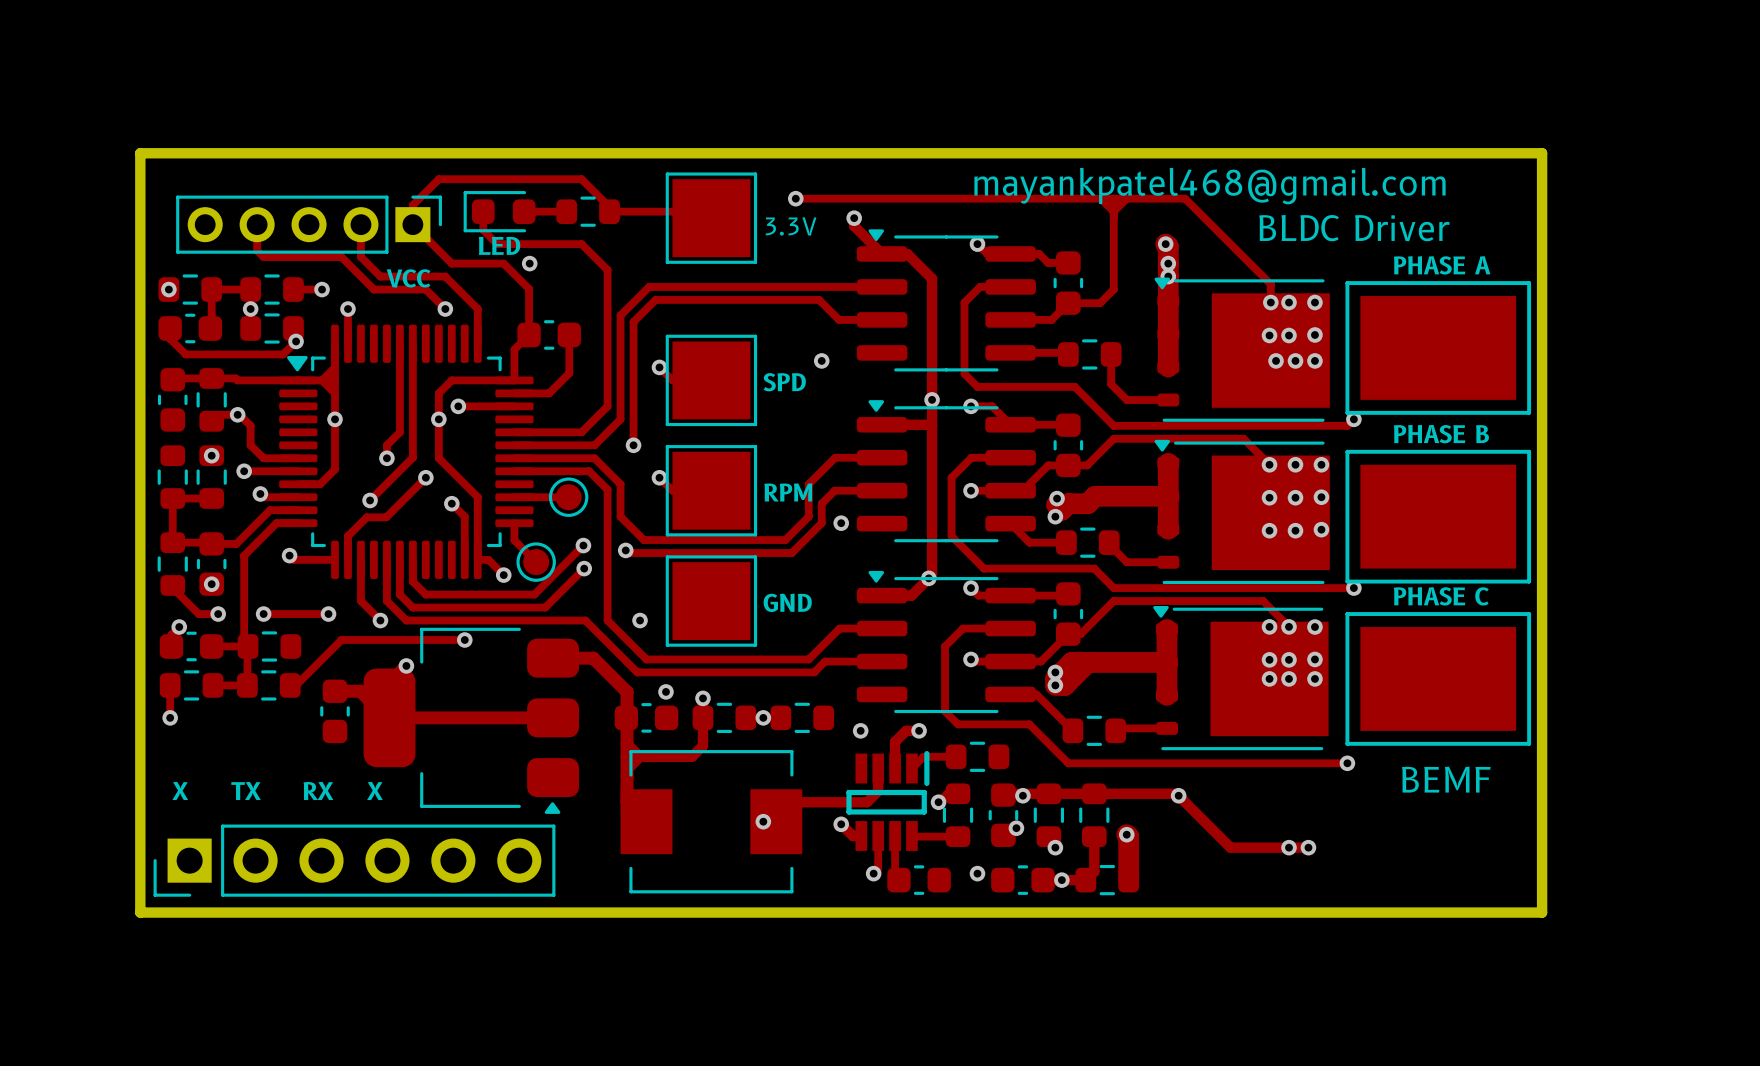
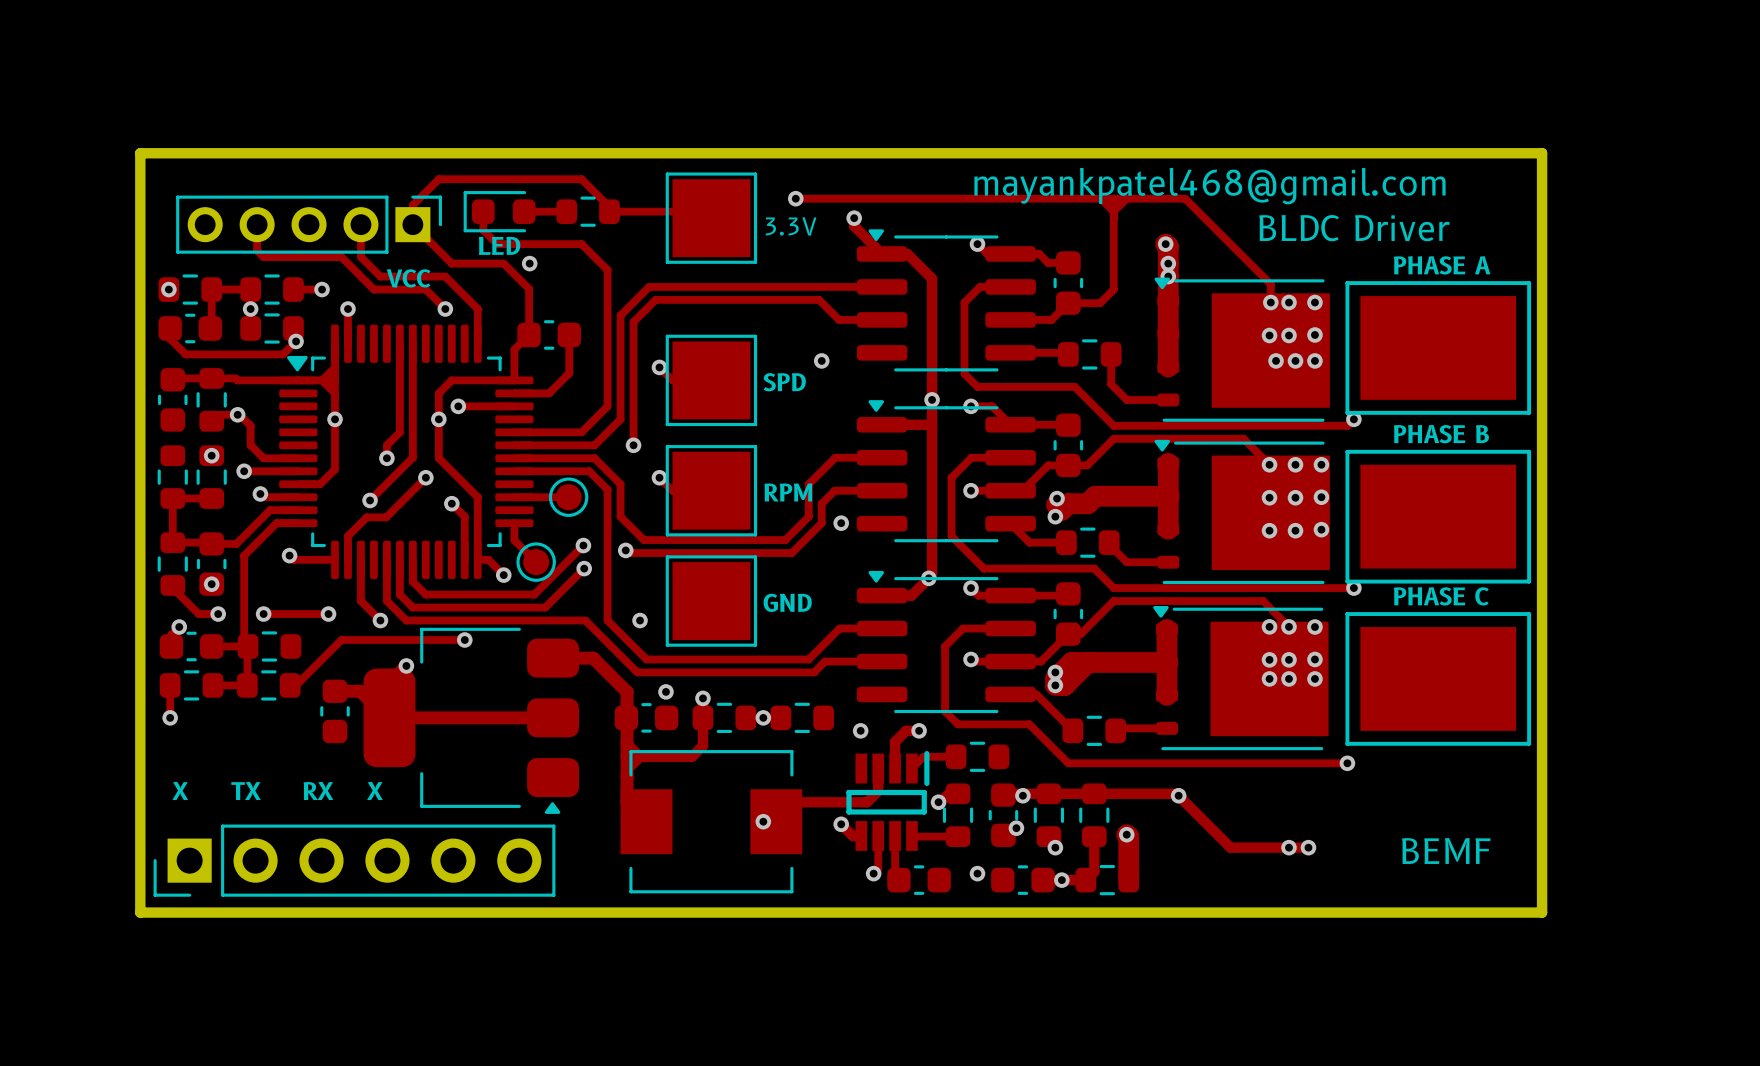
text position: BEMF (1446, 779) -> BEMF (1446, 850)

